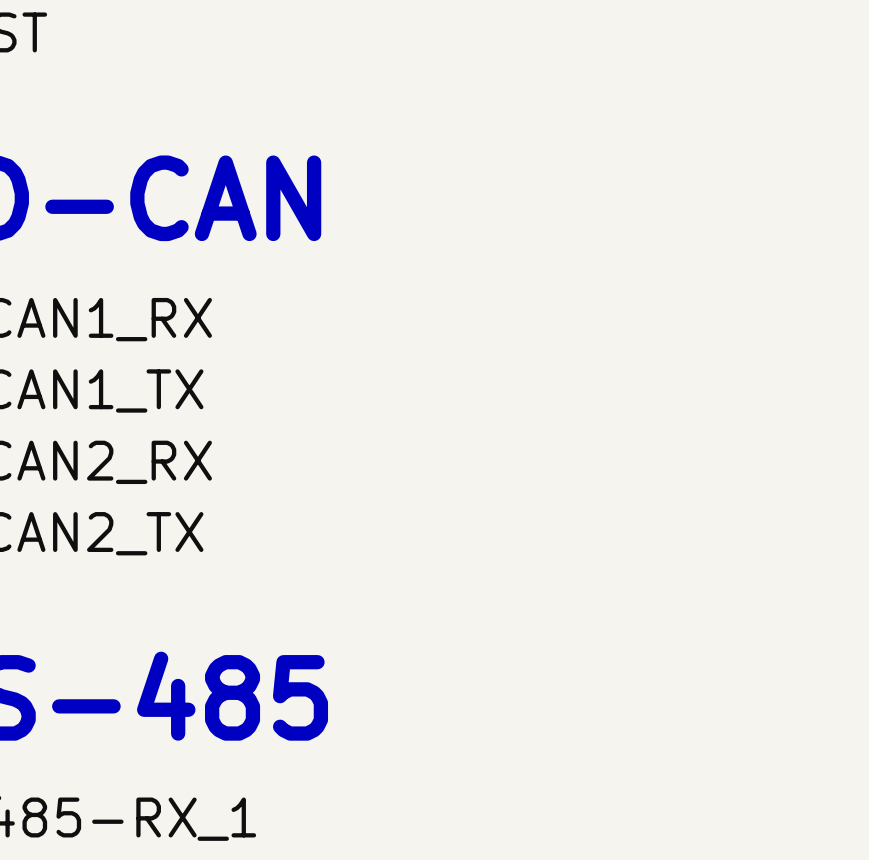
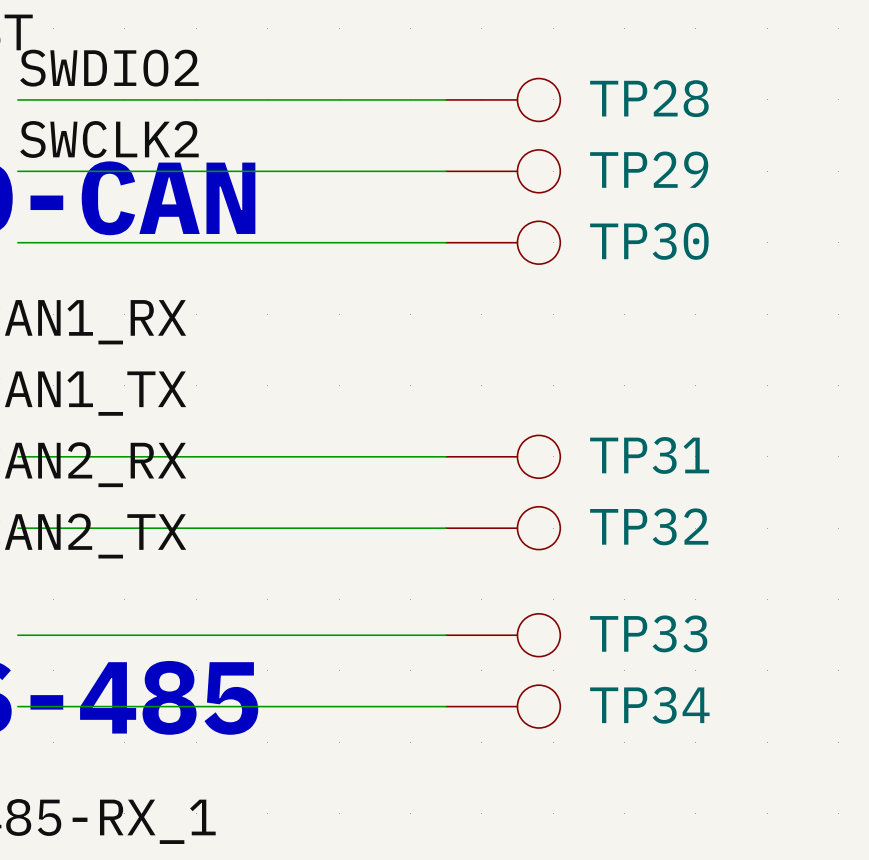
label: none -> SWDIO2 (109, 68)
wire: none -> (17, 99) (446, 99)
TP28: none -> (503, 99)
label: none -> SWCLK2 (109, 139)
wire: none -> (17, 171) (446, 171)
TP29: none -> (503, 171)
wire: none -> (17, 242) (446, 242)
TP30: none -> (503, 242)
wire: none -> (17, 456) (446, 456)
TP31: none -> (503, 456)
wire: none -> (17, 528) (446, 528)
TP32: none -> (503, 528)
wire: none -> (17, 635) (446, 635)
TP33: none -> (503, 635)
wire: none -> (17, 706) (446, 706)
TP34: none -> (503, 706)

